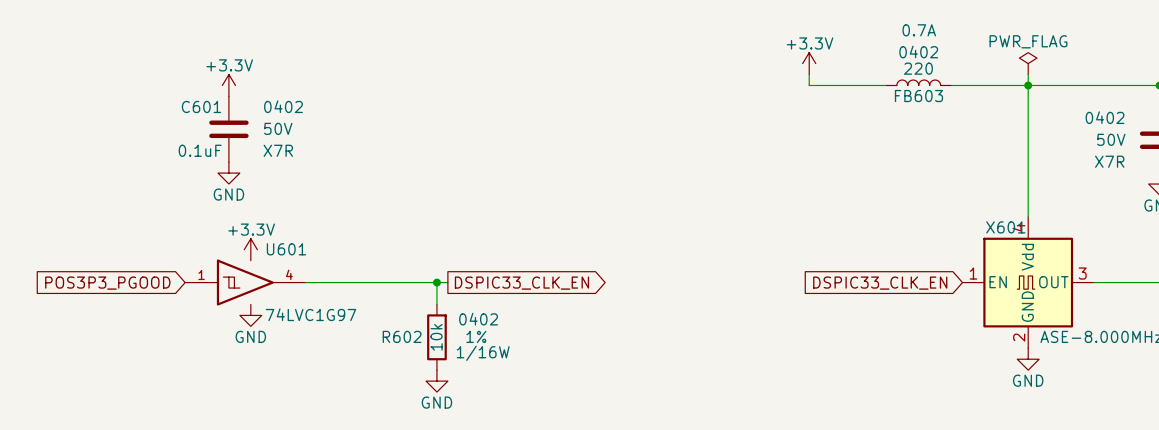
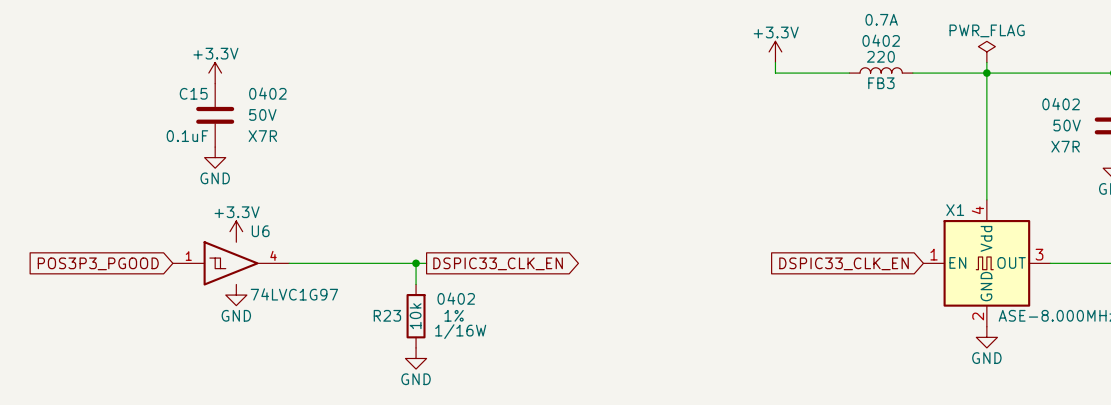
FB603 name: FB603 (918, 96) -> FB3 (881, 83)
C601 name: C601 (201, 106) -> C15 (193, 93)
X601 name: X601 (1005, 227) -> X1 (955, 210)
U601 name: U601 (286, 249) -> U6 (260, 231)
R602 name: R602 (402, 336) -> R23 (387, 315)

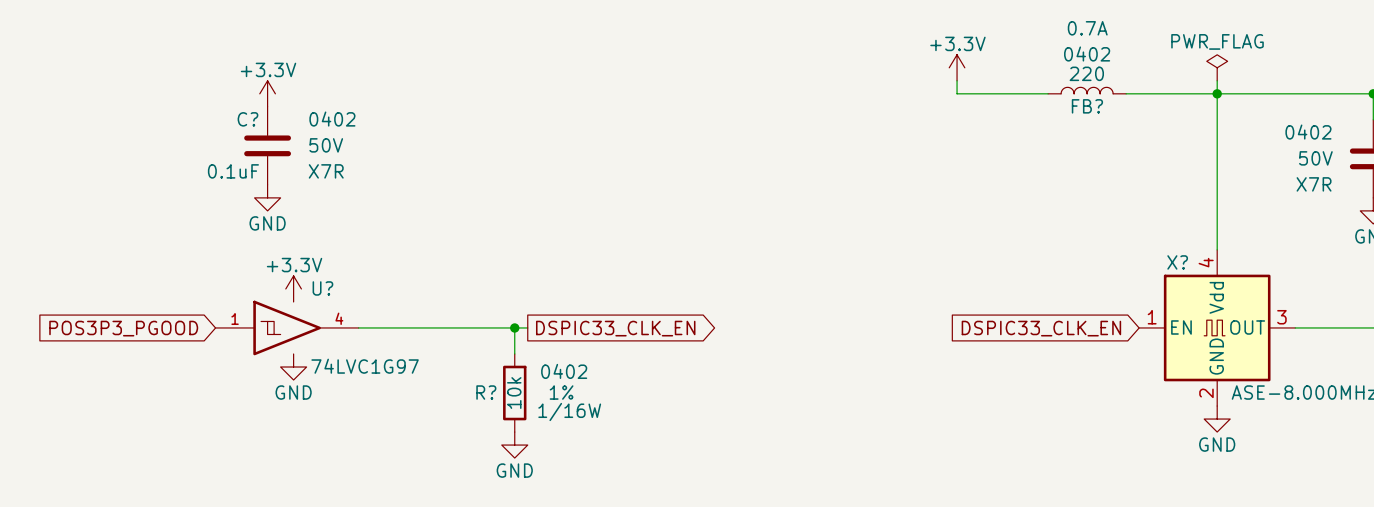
FB3 name: FB3 (881, 83) -> FB? (1087, 106)
C15 name: C15 (193, 93) -> C? (247, 119)
X1 name: X1 (955, 210) -> X? (1177, 262)
U6 name: U6 (260, 231) -> U? (322, 288)
R23 name: R23 (387, 315) -> R? (486, 392)

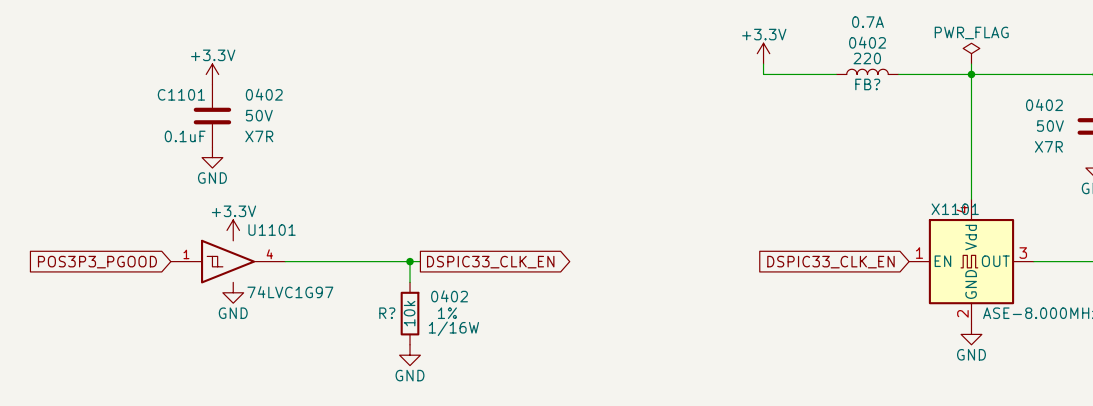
C? name: C? (247, 119) -> C1101 (181, 94)
X? name: X? (1177, 262) -> X1101 (955, 209)
U? name: U? (322, 288) -> U1101 (272, 230)

